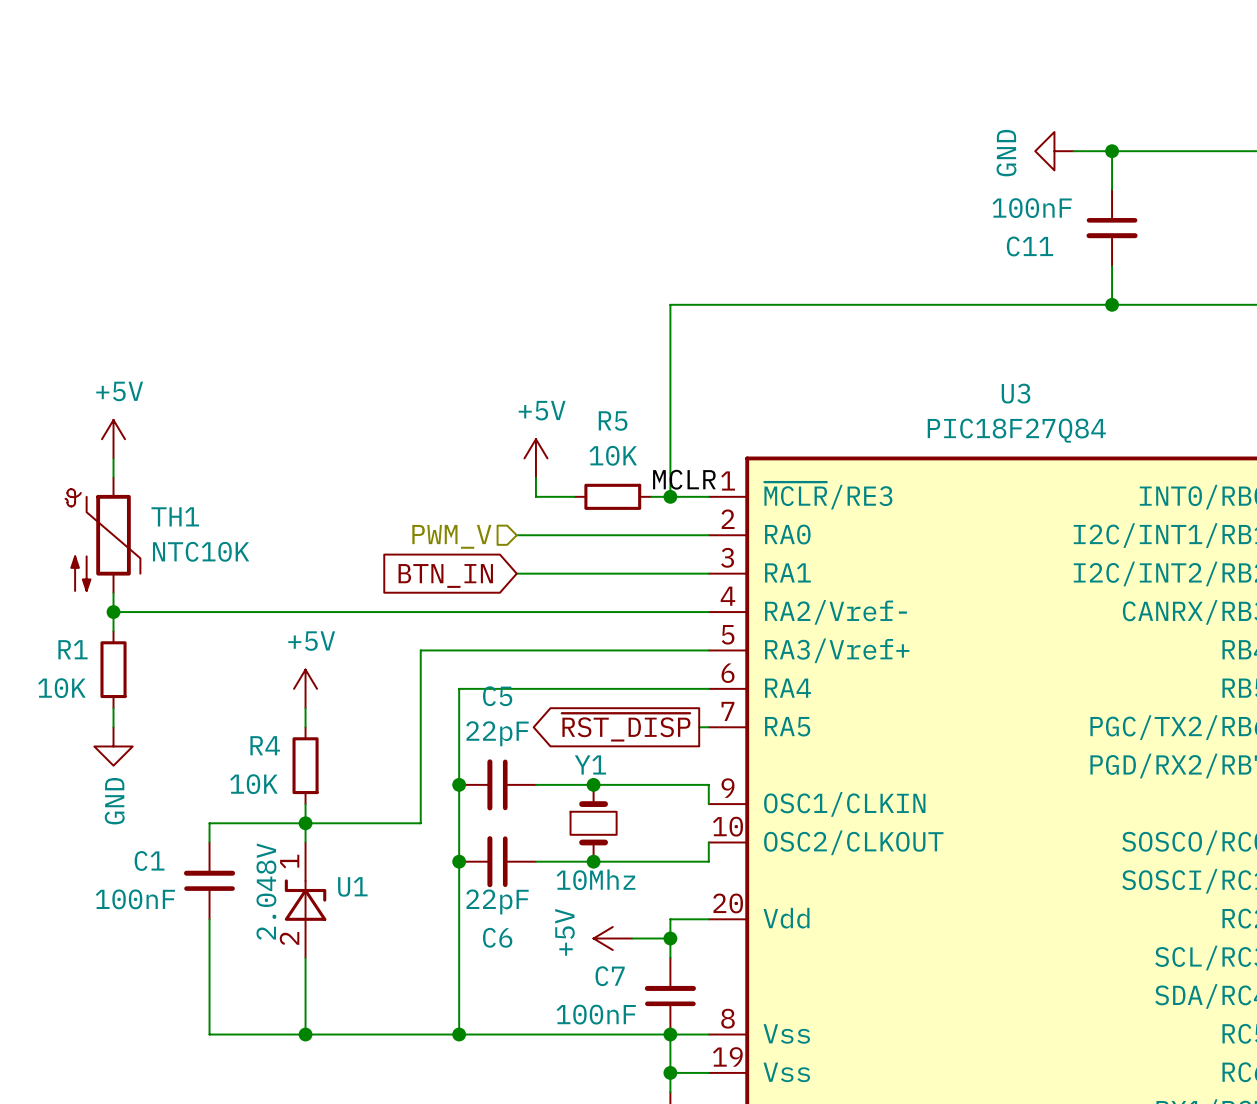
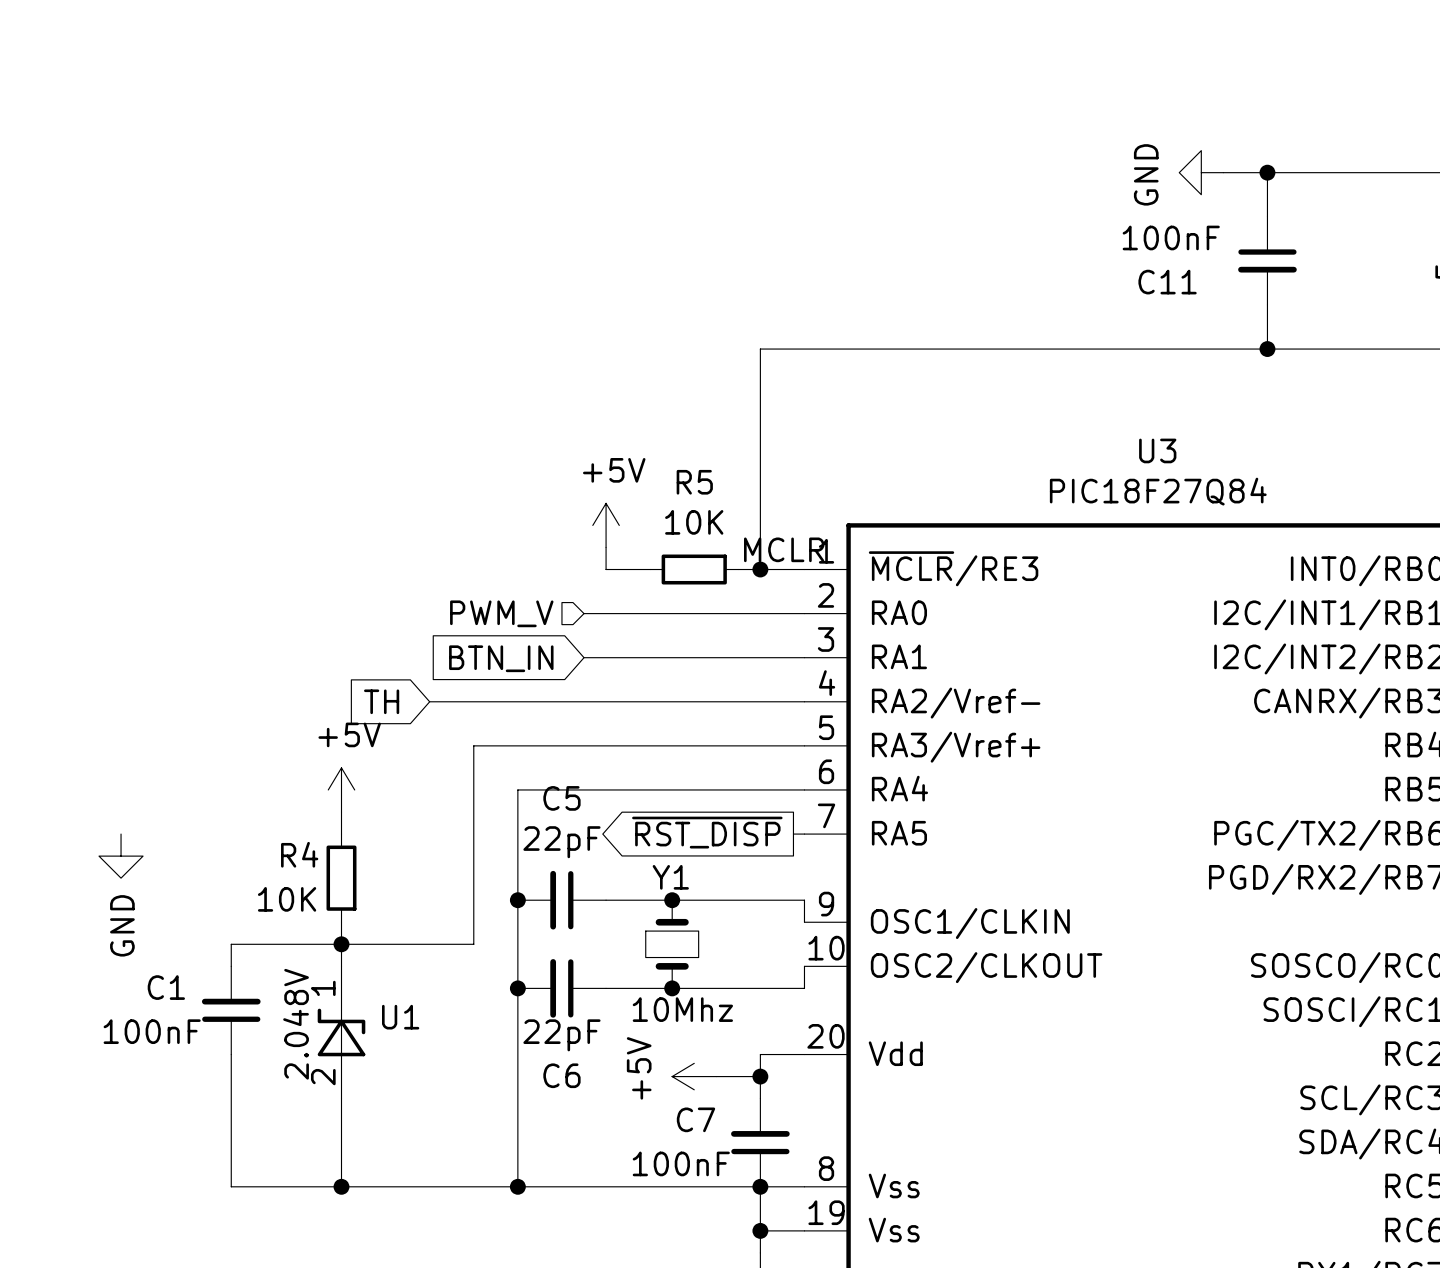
power symbol: +5V (113, 439) -> none
wire: (113, 458) (113, 477) -> none
TH1: NTC10K (102, 535) -> none
wire: (113, 592) (113, 631) -> none
wire: (113, 612) (382, 612) -> none
junction: (113, 612) -> none
global label: none -> TH (381, 701)
R1: 10K (113, 669) -> none
wire: (113, 708) (113, 727) -> none

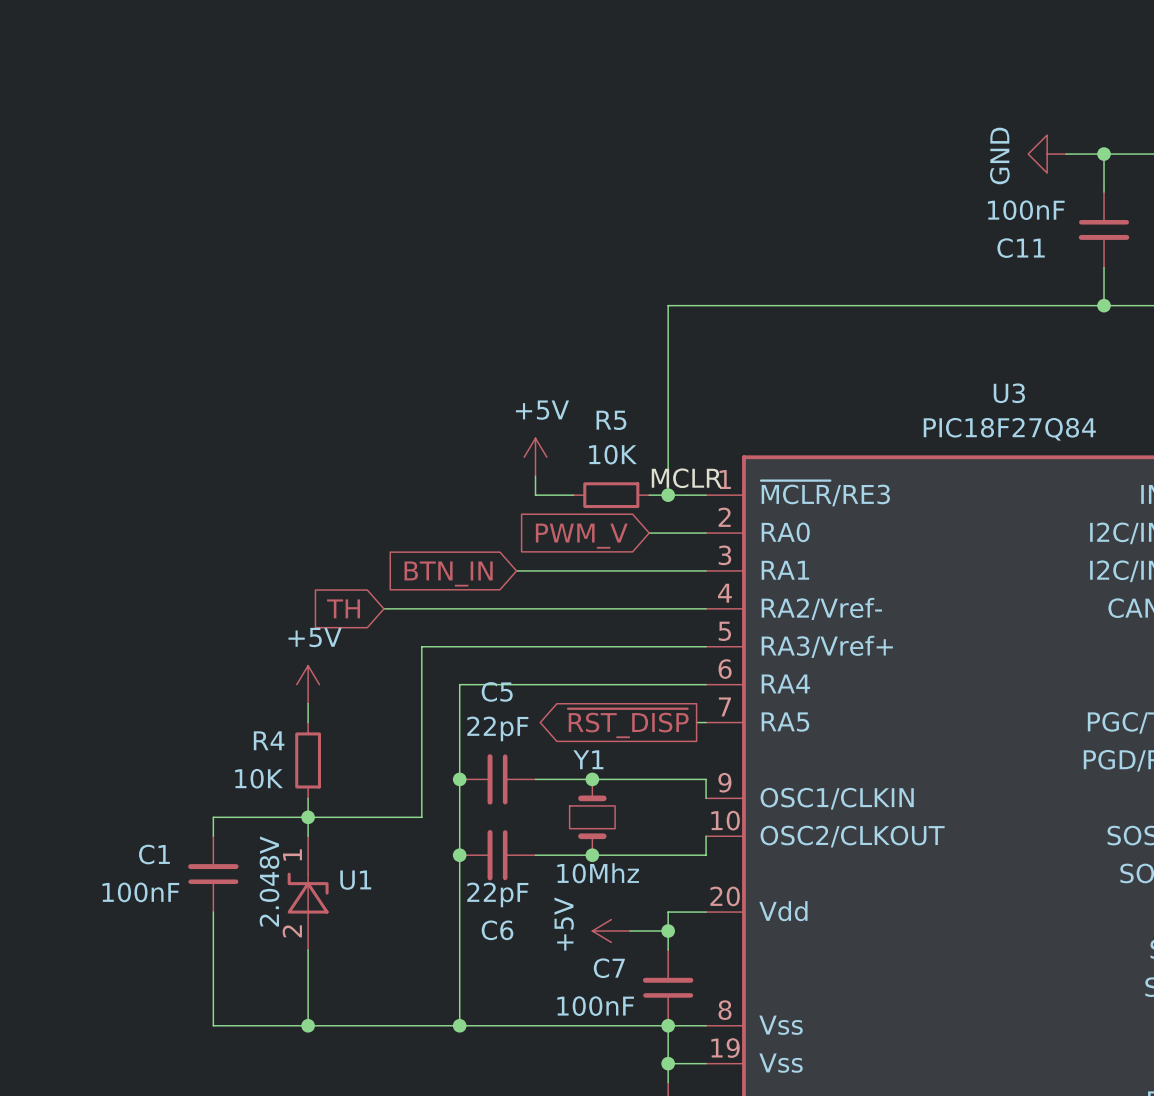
hierarchical label: PWM_V (501, 613) -> none
wire: (584, 613) (738, 613) -> none
global label: none -> PWM_V (581, 536)
power symbol: GND (121, 856) -> none

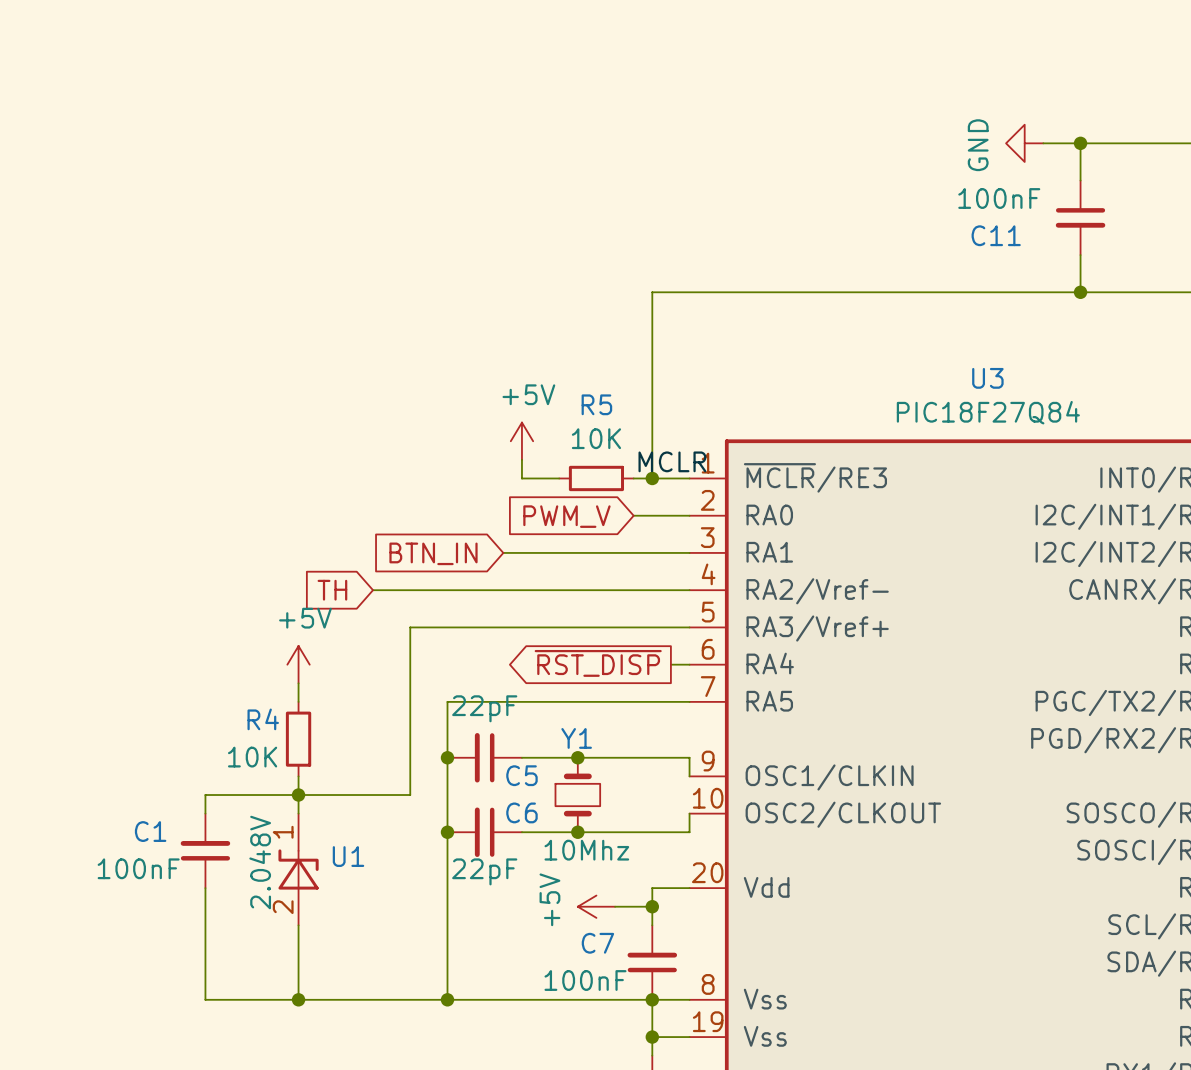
wire: (687, 684) (459, 684) (459, 722) -> (680, 701) (447, 701)
C5 name position: C5 (497, 691) -> C5 (521, 775)
global label position: ~{RST_DISP} (628, 723) -> ~{RST_DISP} (598, 663)
C6 name position: C6 (497, 930) -> C6 (521, 812)

